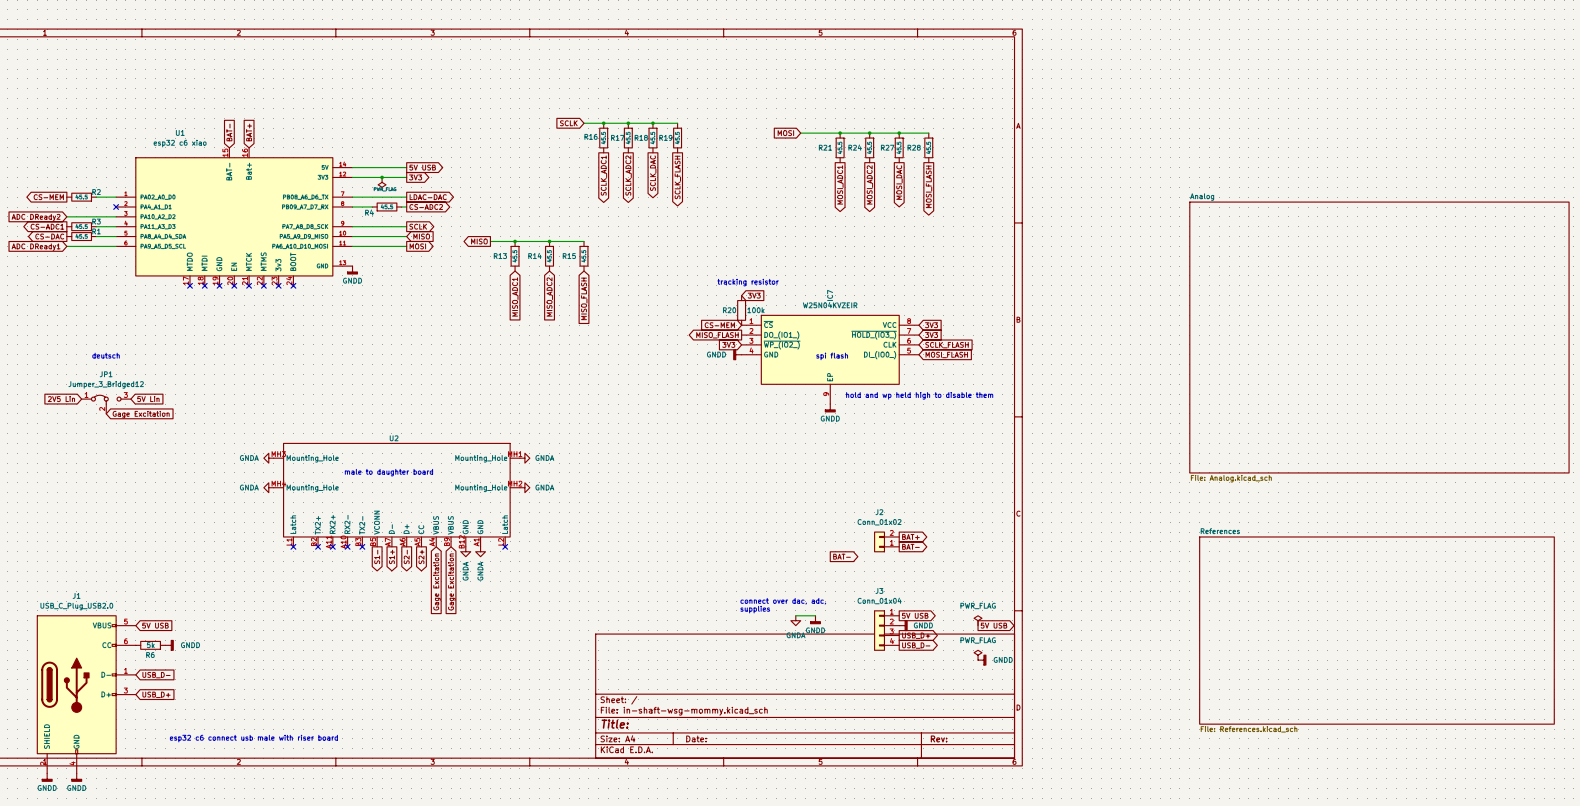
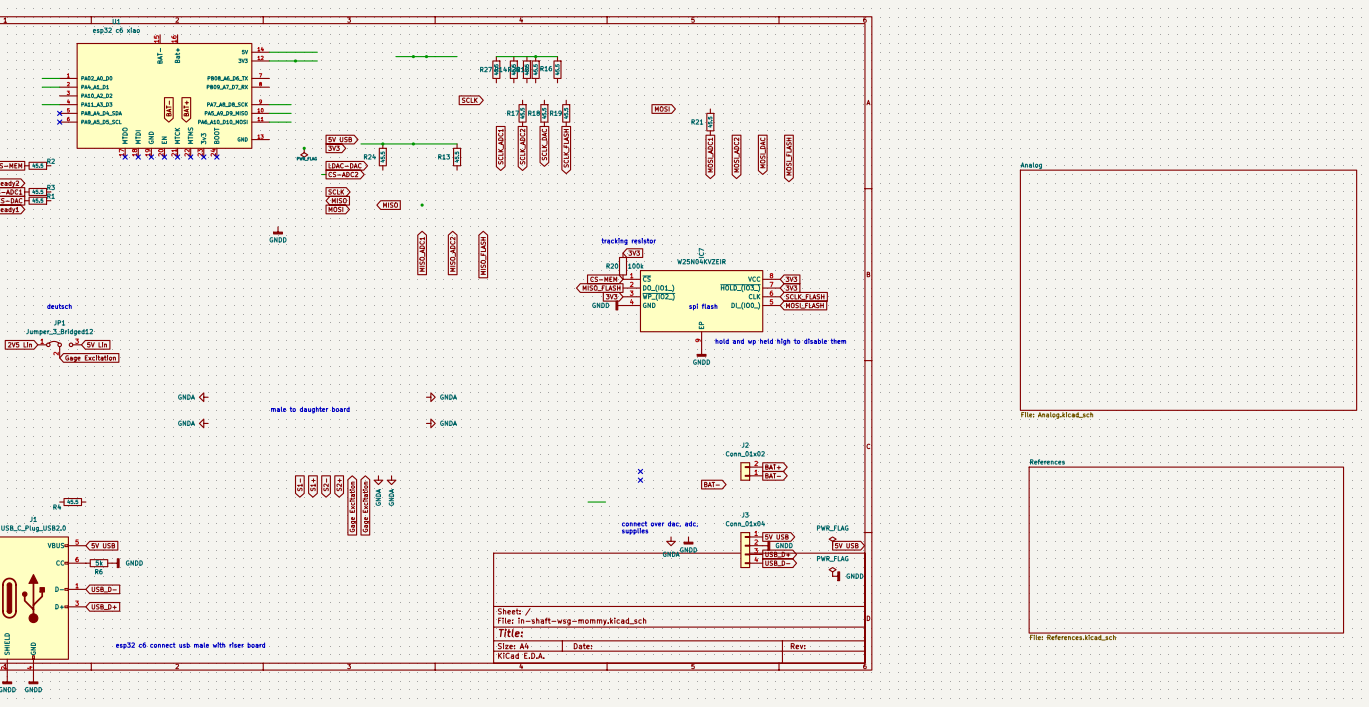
wire: none -> (269, 52) (317, 52)
wire: none -> (395, 56) (457, 56)
junction: none -> (413, 56)
junction: none -> (426, 56)
wire: none -> (496, 56) (557, 56)
junction: none -> (535, 56)
junction: none -> (295, 60)
wire: none -> (42, 78) (59, 78)
wire: (584, 123) (677, 123) -> none
junction: (603, 123) -> none
junction: (628, 123) -> none
junction: (652, 123) -> none
wire: none -> (42, 104) (59, 104)
wire: none -> (269, 104) (291, 104)
wire: (800, 133) (928, 133) -> none
junction: (840, 133) -> none
junction: (869, 133) -> none
junction: (899, 133) -> none
no-connect mark: none -> (59, 113)
wire: none -> (269, 113) (291, 113)
part position: (603, 138) -> (557, 69)
no-connect mark: none -> (59, 122)
wire: none -> (269, 122) (291, 122)
part position: (869, 147) -> (382, 157)
part position: (899, 147) -> (496, 69)
part position: (928, 147) -> (526, 69)
wire: (352, 167) (406, 167) -> (269, 60) (317, 60)
wire: none -> (360, 143) (457, 143)
junction: none -> (382, 143)
junction: none -> (413, 143)
wire: (352, 177) (406, 177) -> none
no-connect mark: none -> (125, 157)
no-connect mark: none -> (138, 157)
no-connect mark: none -> (151, 157)
no-connect mark: none -> (164, 157)
no-connect mark: none -> (177, 157)
no-connect mark: none -> (190, 157)
no-connect mark: none -> (203, 157)
no-connect mark: none -> (216, 157)
wire: (96, 197) (116, 197) -> (42, 87) (59, 87)
wire: (352, 197) (406, 197) -> none
no-connect mark: (116, 207) -> none
wire: (352, 207) (372, 207) -> none
part position: (387, 207) -> (72, 502)
wire: (66, 216) (116, 216) -> none
part position: (234, 216) -> (164, 95)
wire: (96, 226) (116, 226) -> none
wire: (352, 226) (406, 226) -> none
wire: (96, 236) (116, 236) -> none
wire: (352, 236) (406, 236) -> none
wire: (490, 241) (584, 241) -> none
junction: (549, 241) -> none
wire: (66, 246) (116, 246) -> none
wire: (352, 246) (406, 246) -> none
part position: (515, 256) -> (457, 157)
part position: (549, 256) -> (513, 69)
part position: (584, 256) -> (535, 69)
no-connect mark: (189, 285) -> none
no-connect mark: (204, 285) -> none
no-connect mark: (219, 285) -> none
no-connect mark: (234, 285) -> none
no-connect mark: (249, 285) -> none
no-connect mark: (263, 285) -> none
no-connect mark: (278, 285) -> none
no-connect mark: (293, 285) -> none
part: (396, 495) -> none
no-connect mark: none -> (640, 471)
no-connect mark: (293, 546) -> none
no-connect mark: (318, 546) -> none
no-connect mark: (332, 546) -> none
no-connect mark: (347, 546) -> none
no-connect mark: (362, 546) -> none
no-connect mark: (505, 546) -> none
no-connect mark: none -> (640, 480)
wire: none -> (588, 502) (605, 502)
wire: (795, 615) (815, 615) -> none

